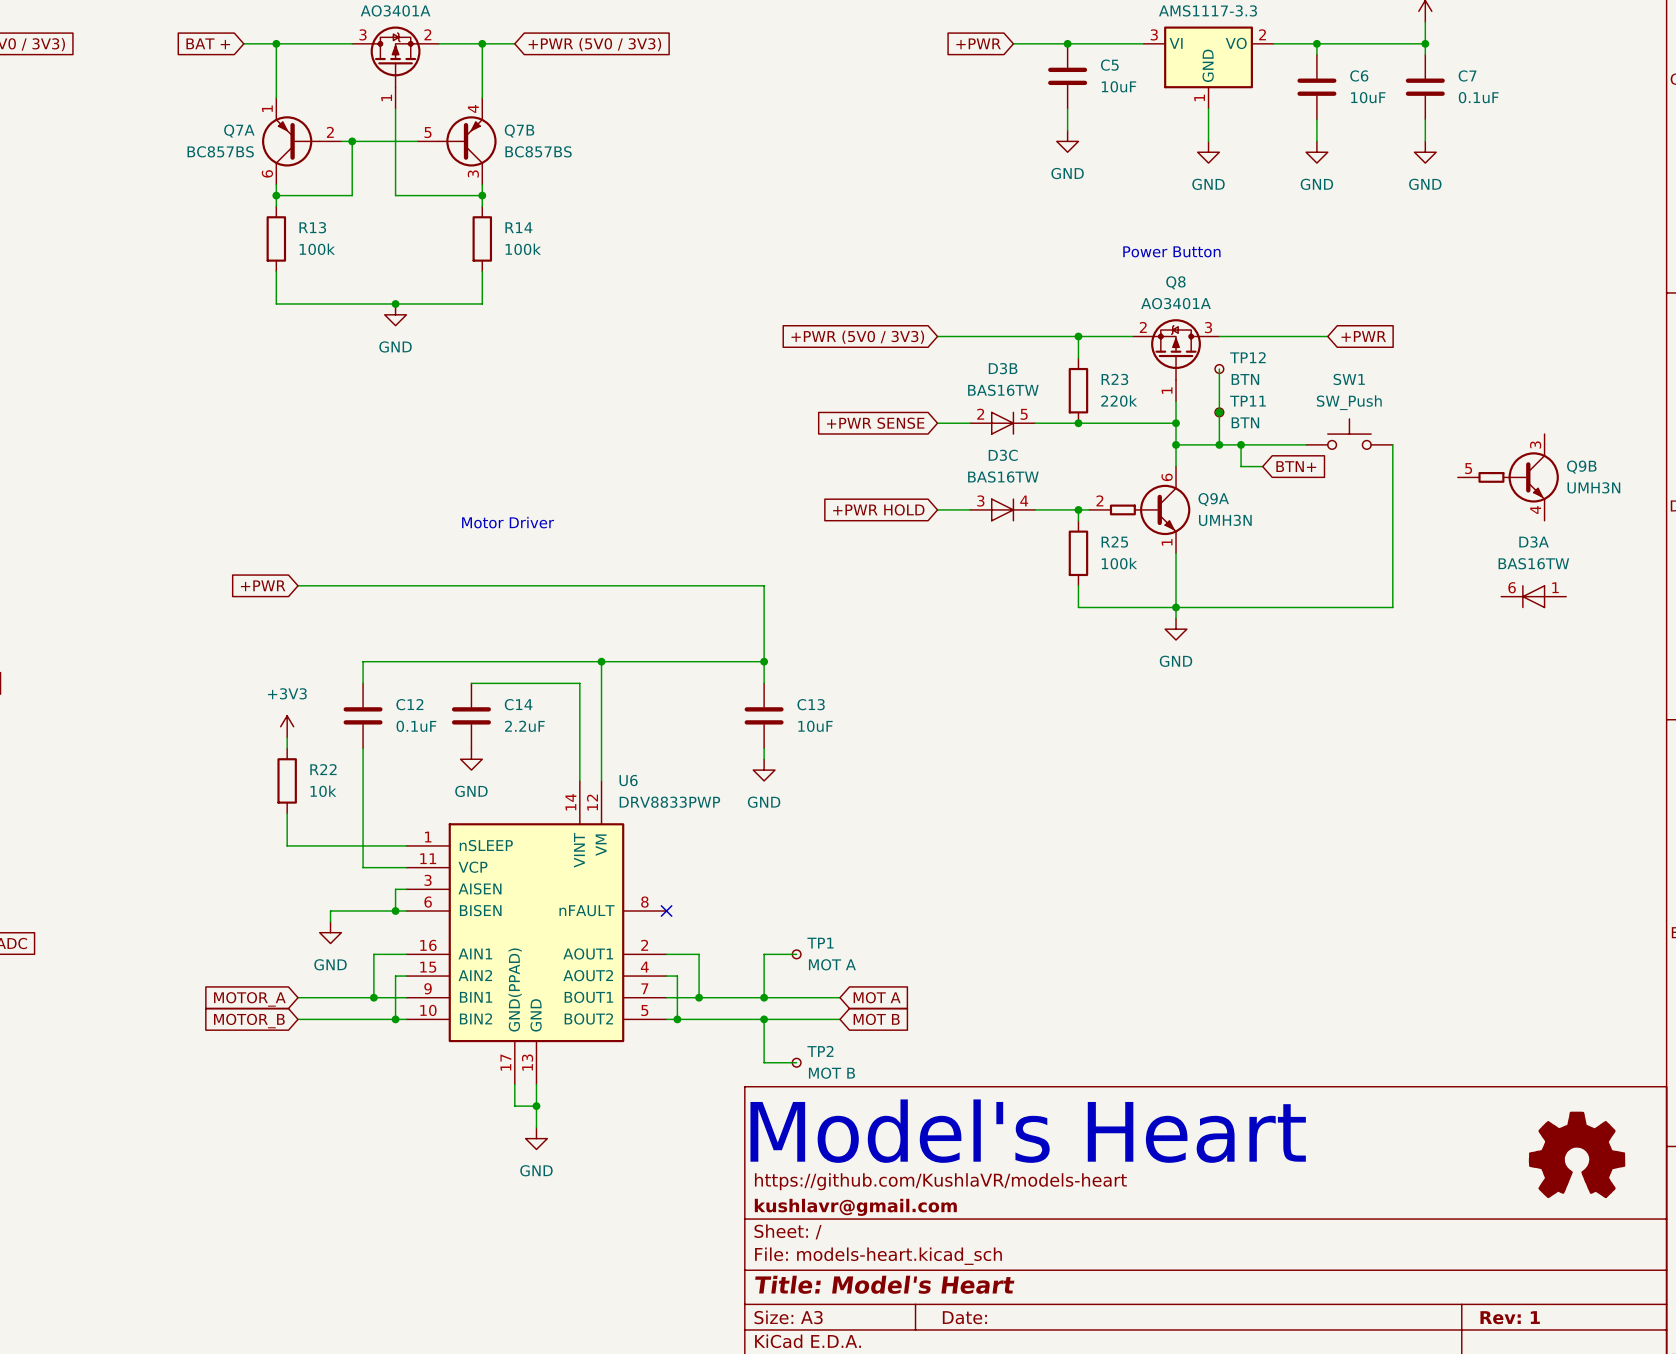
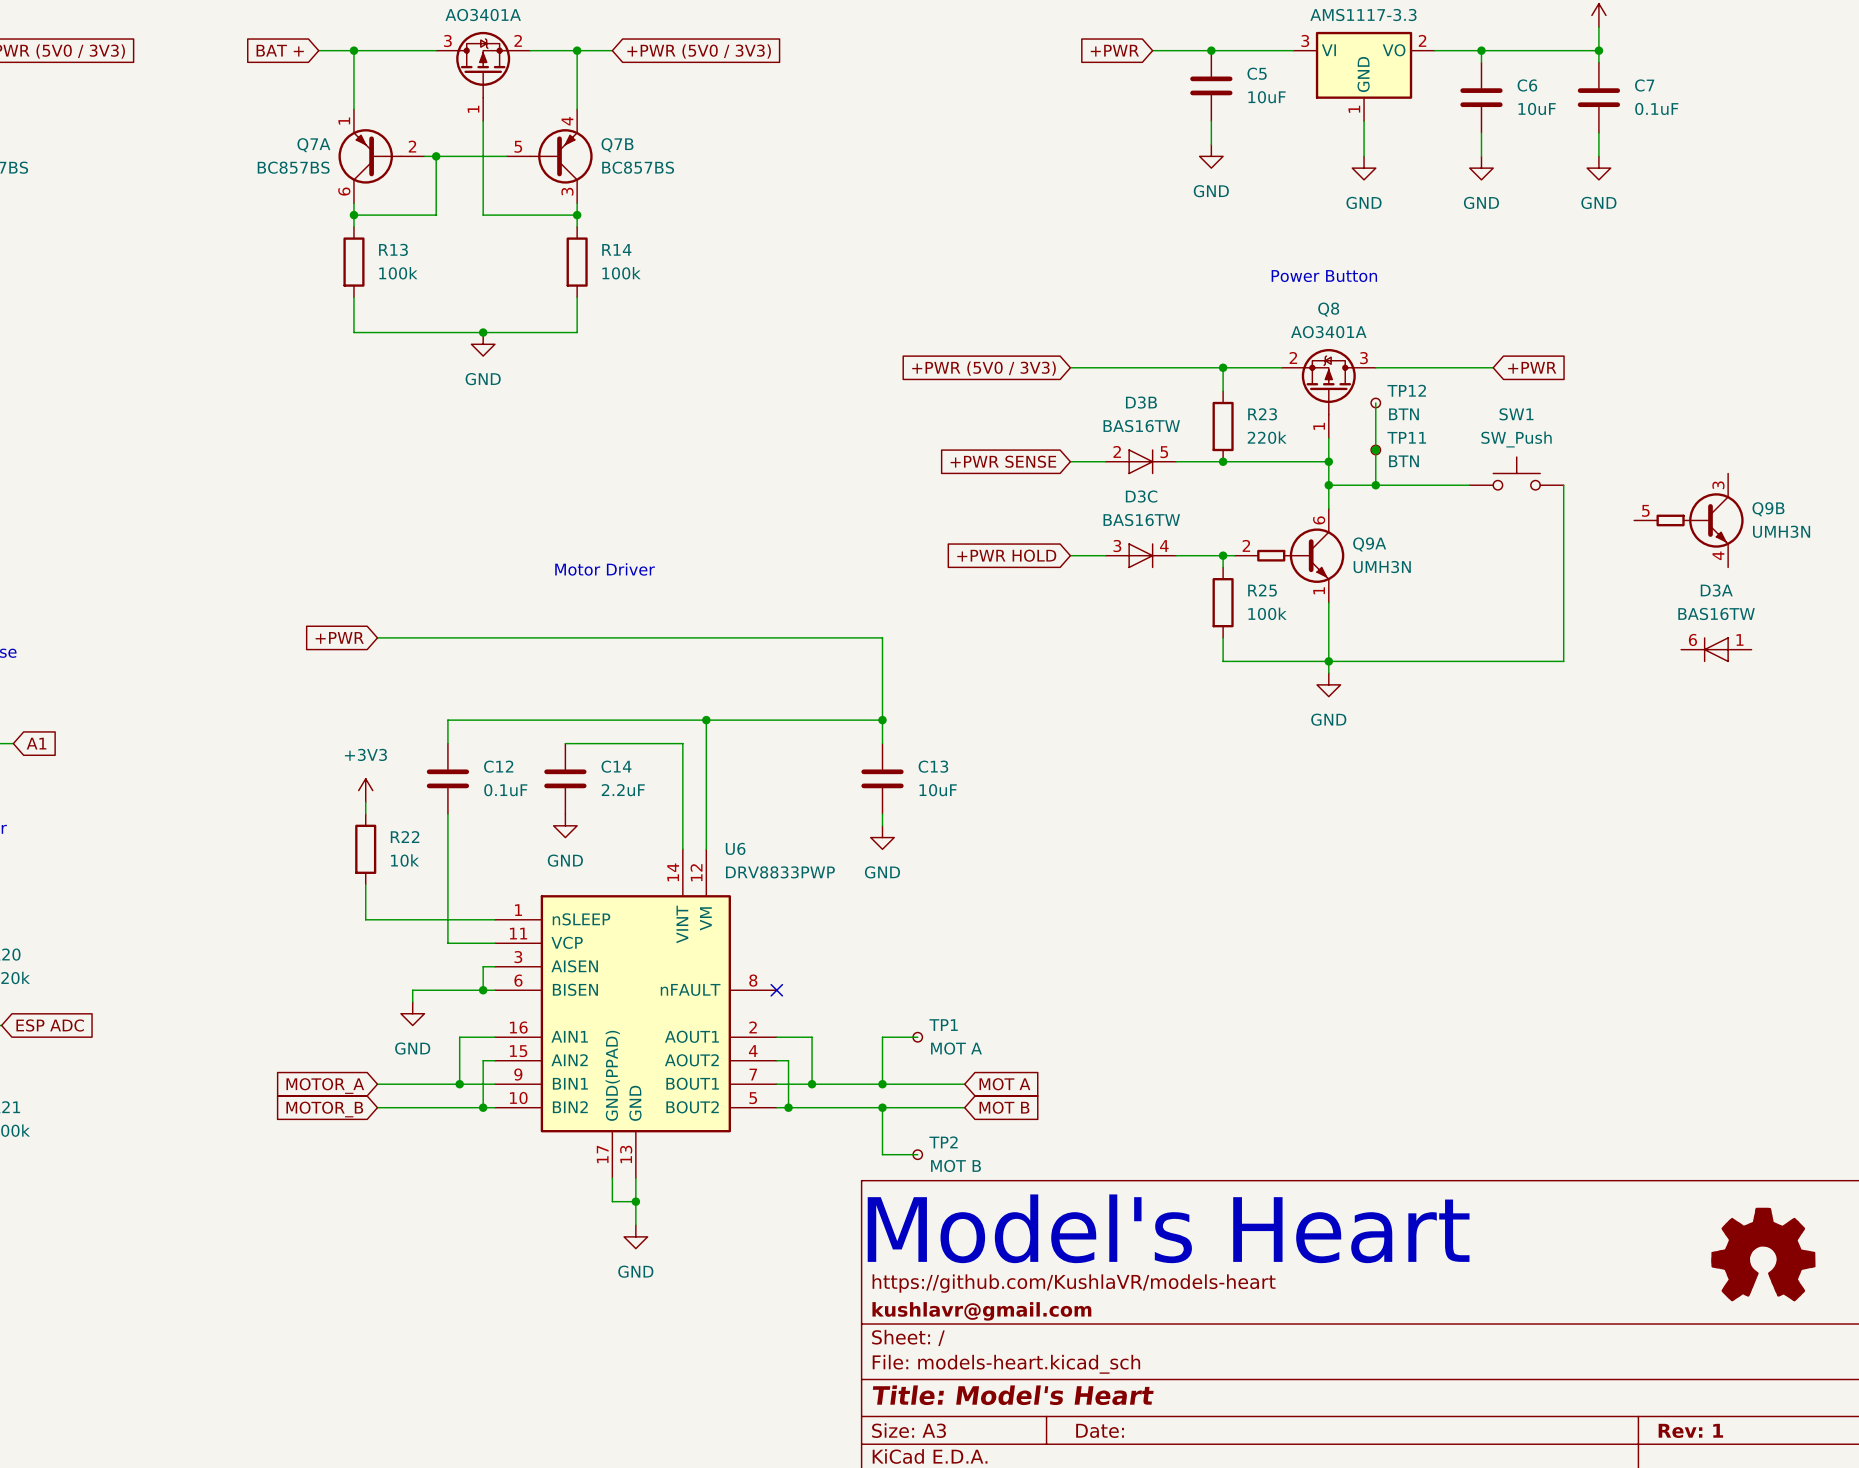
wire: (1241, 444) (1241, 466) (1262, 466) -> none
junction: (1241, 444) -> none
global label: BTN+ (1296, 466) -> none

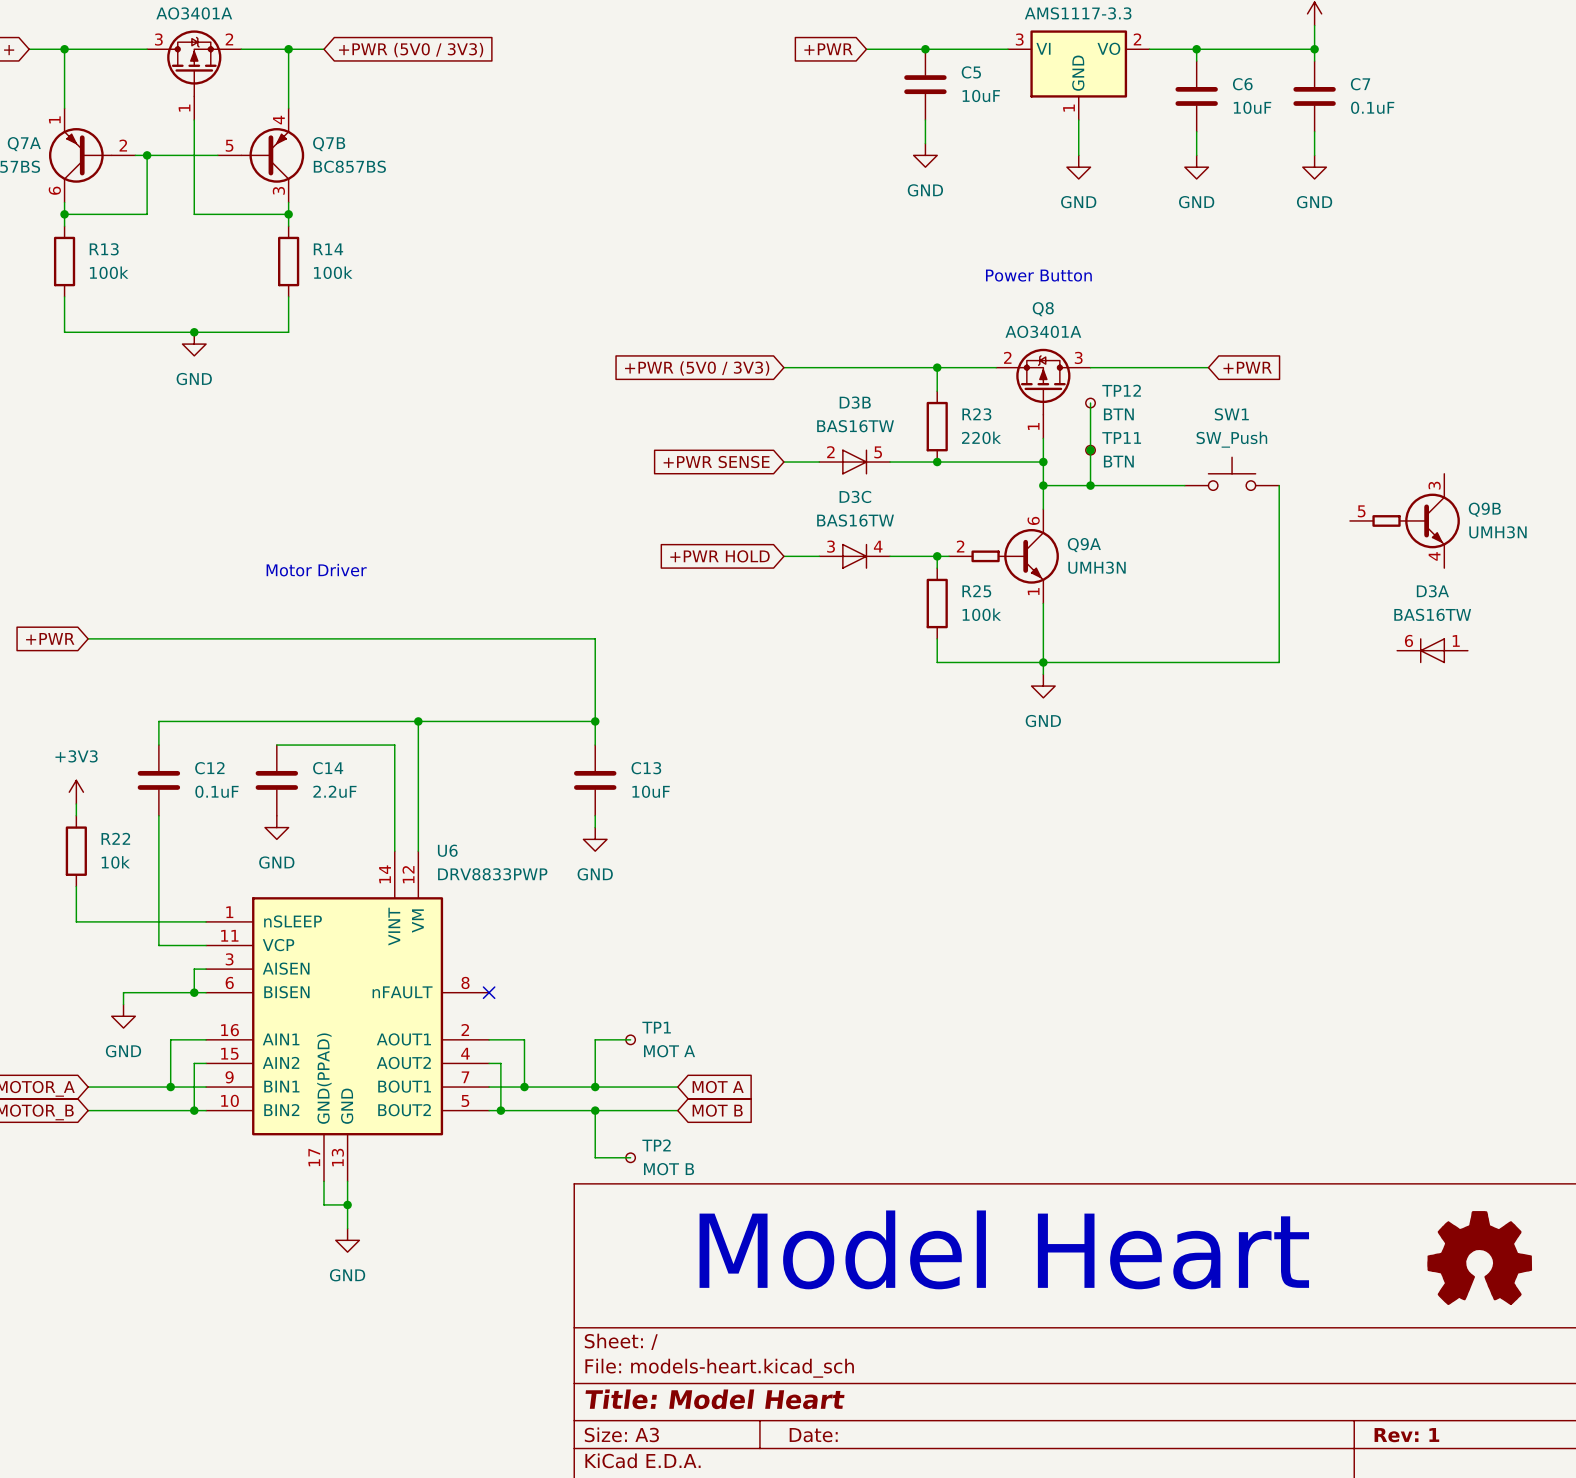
text: Model's Heart (1168, 1228) -> Model Heart (1004, 1249)
title block: https://github.com/KushlaVR/models-heart (1074, 1283) -> none
title block: kushlavr@gmail.com (981, 1311) -> none
title block: Title: Model's Heart (1013, 1395) -> Title: Model Heart (715, 1399)

